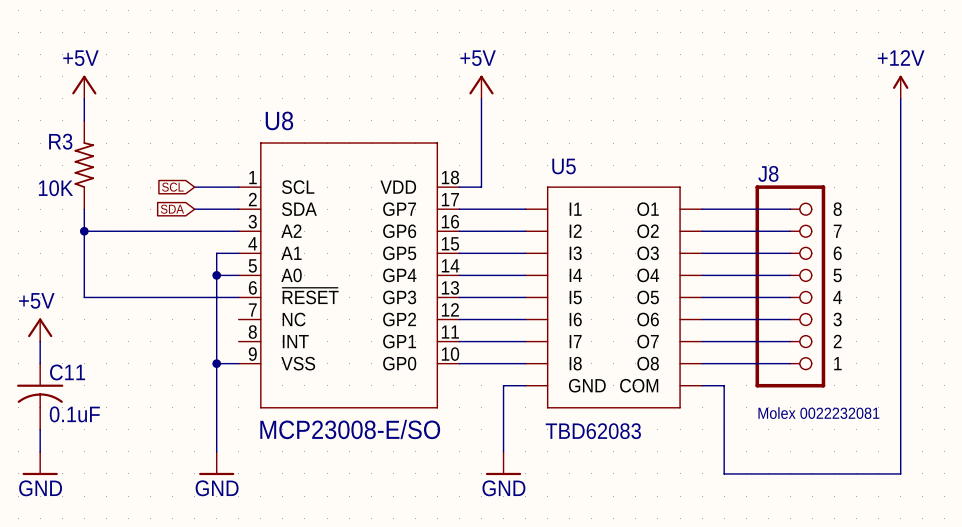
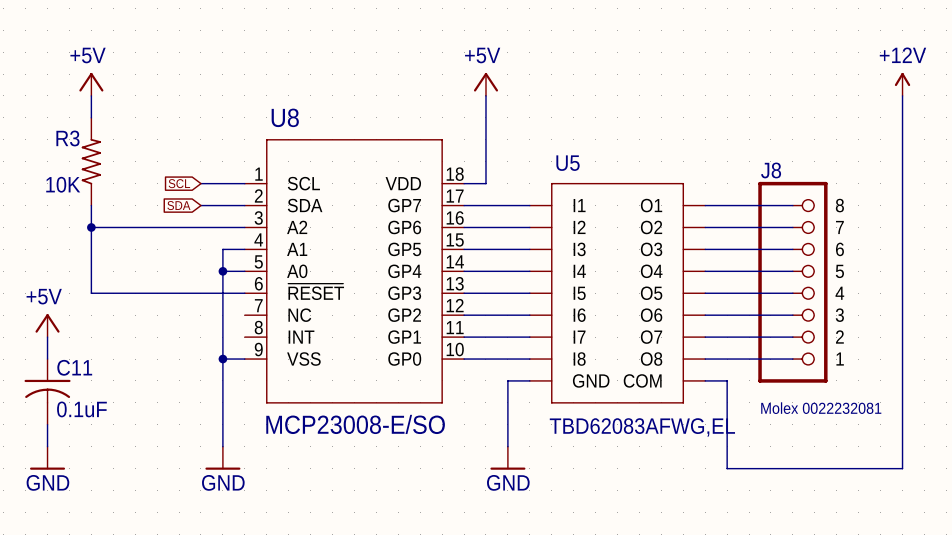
U5 value: TBD62083 (593, 431) -> TBD62083AFWG,EL (642, 427)

